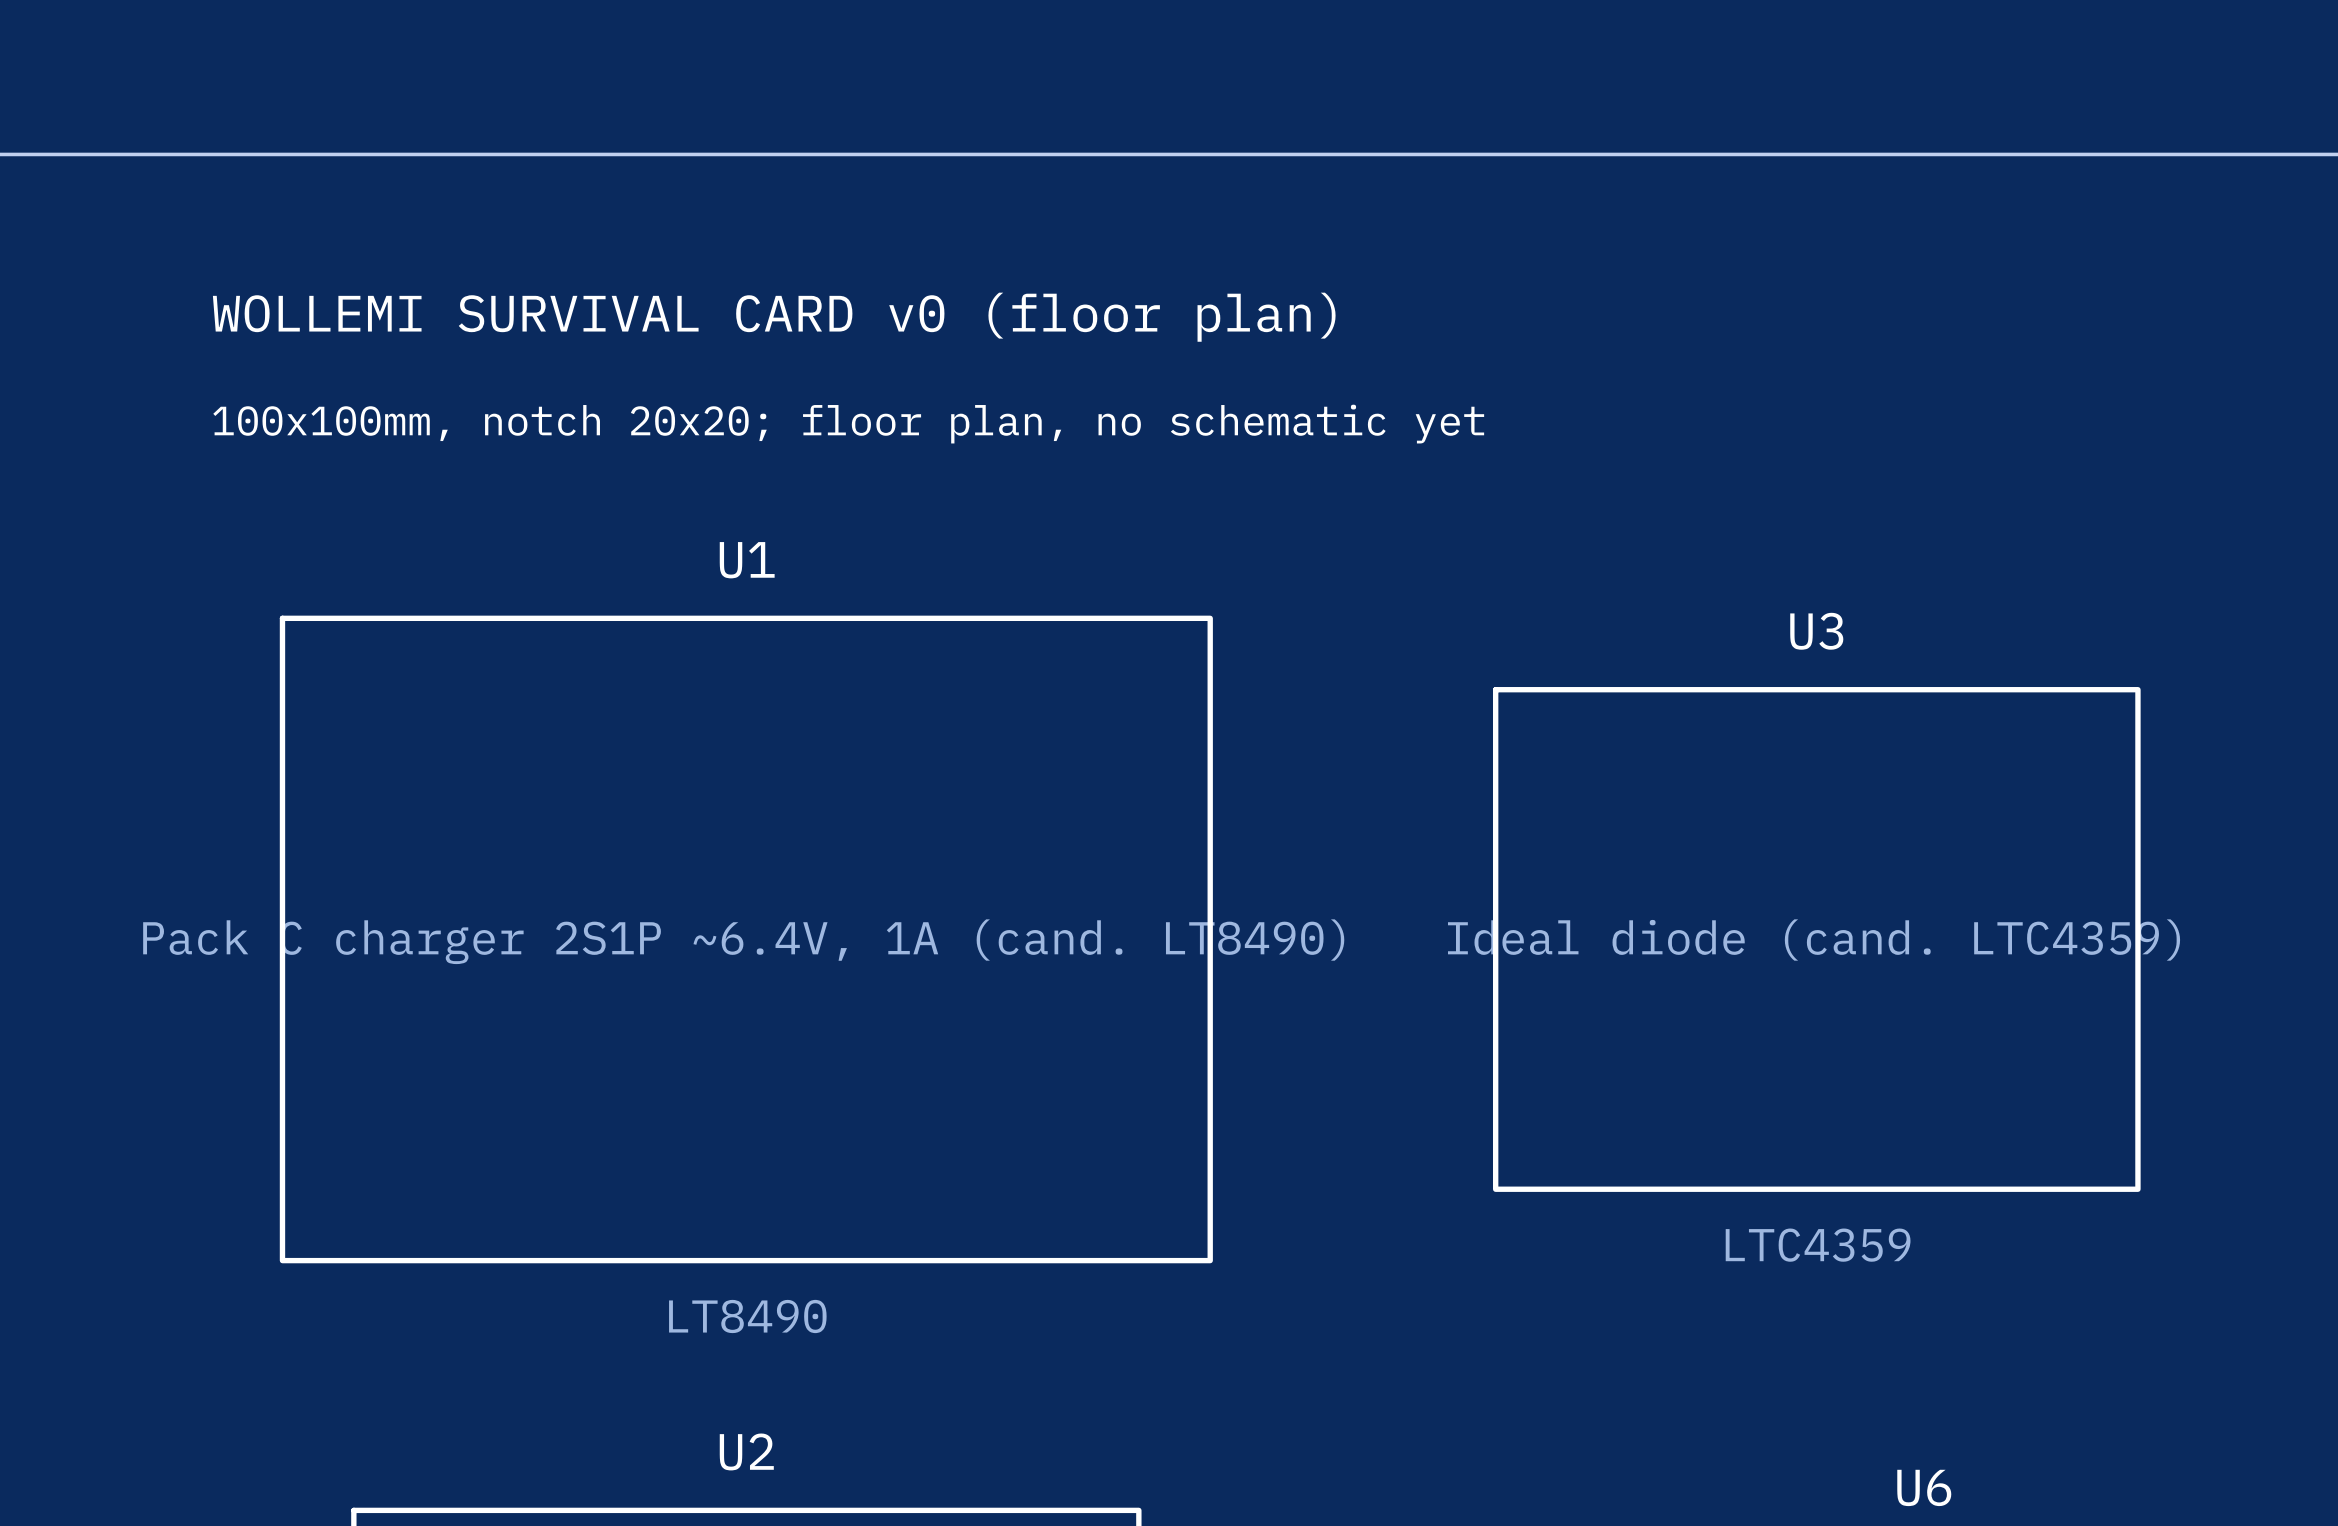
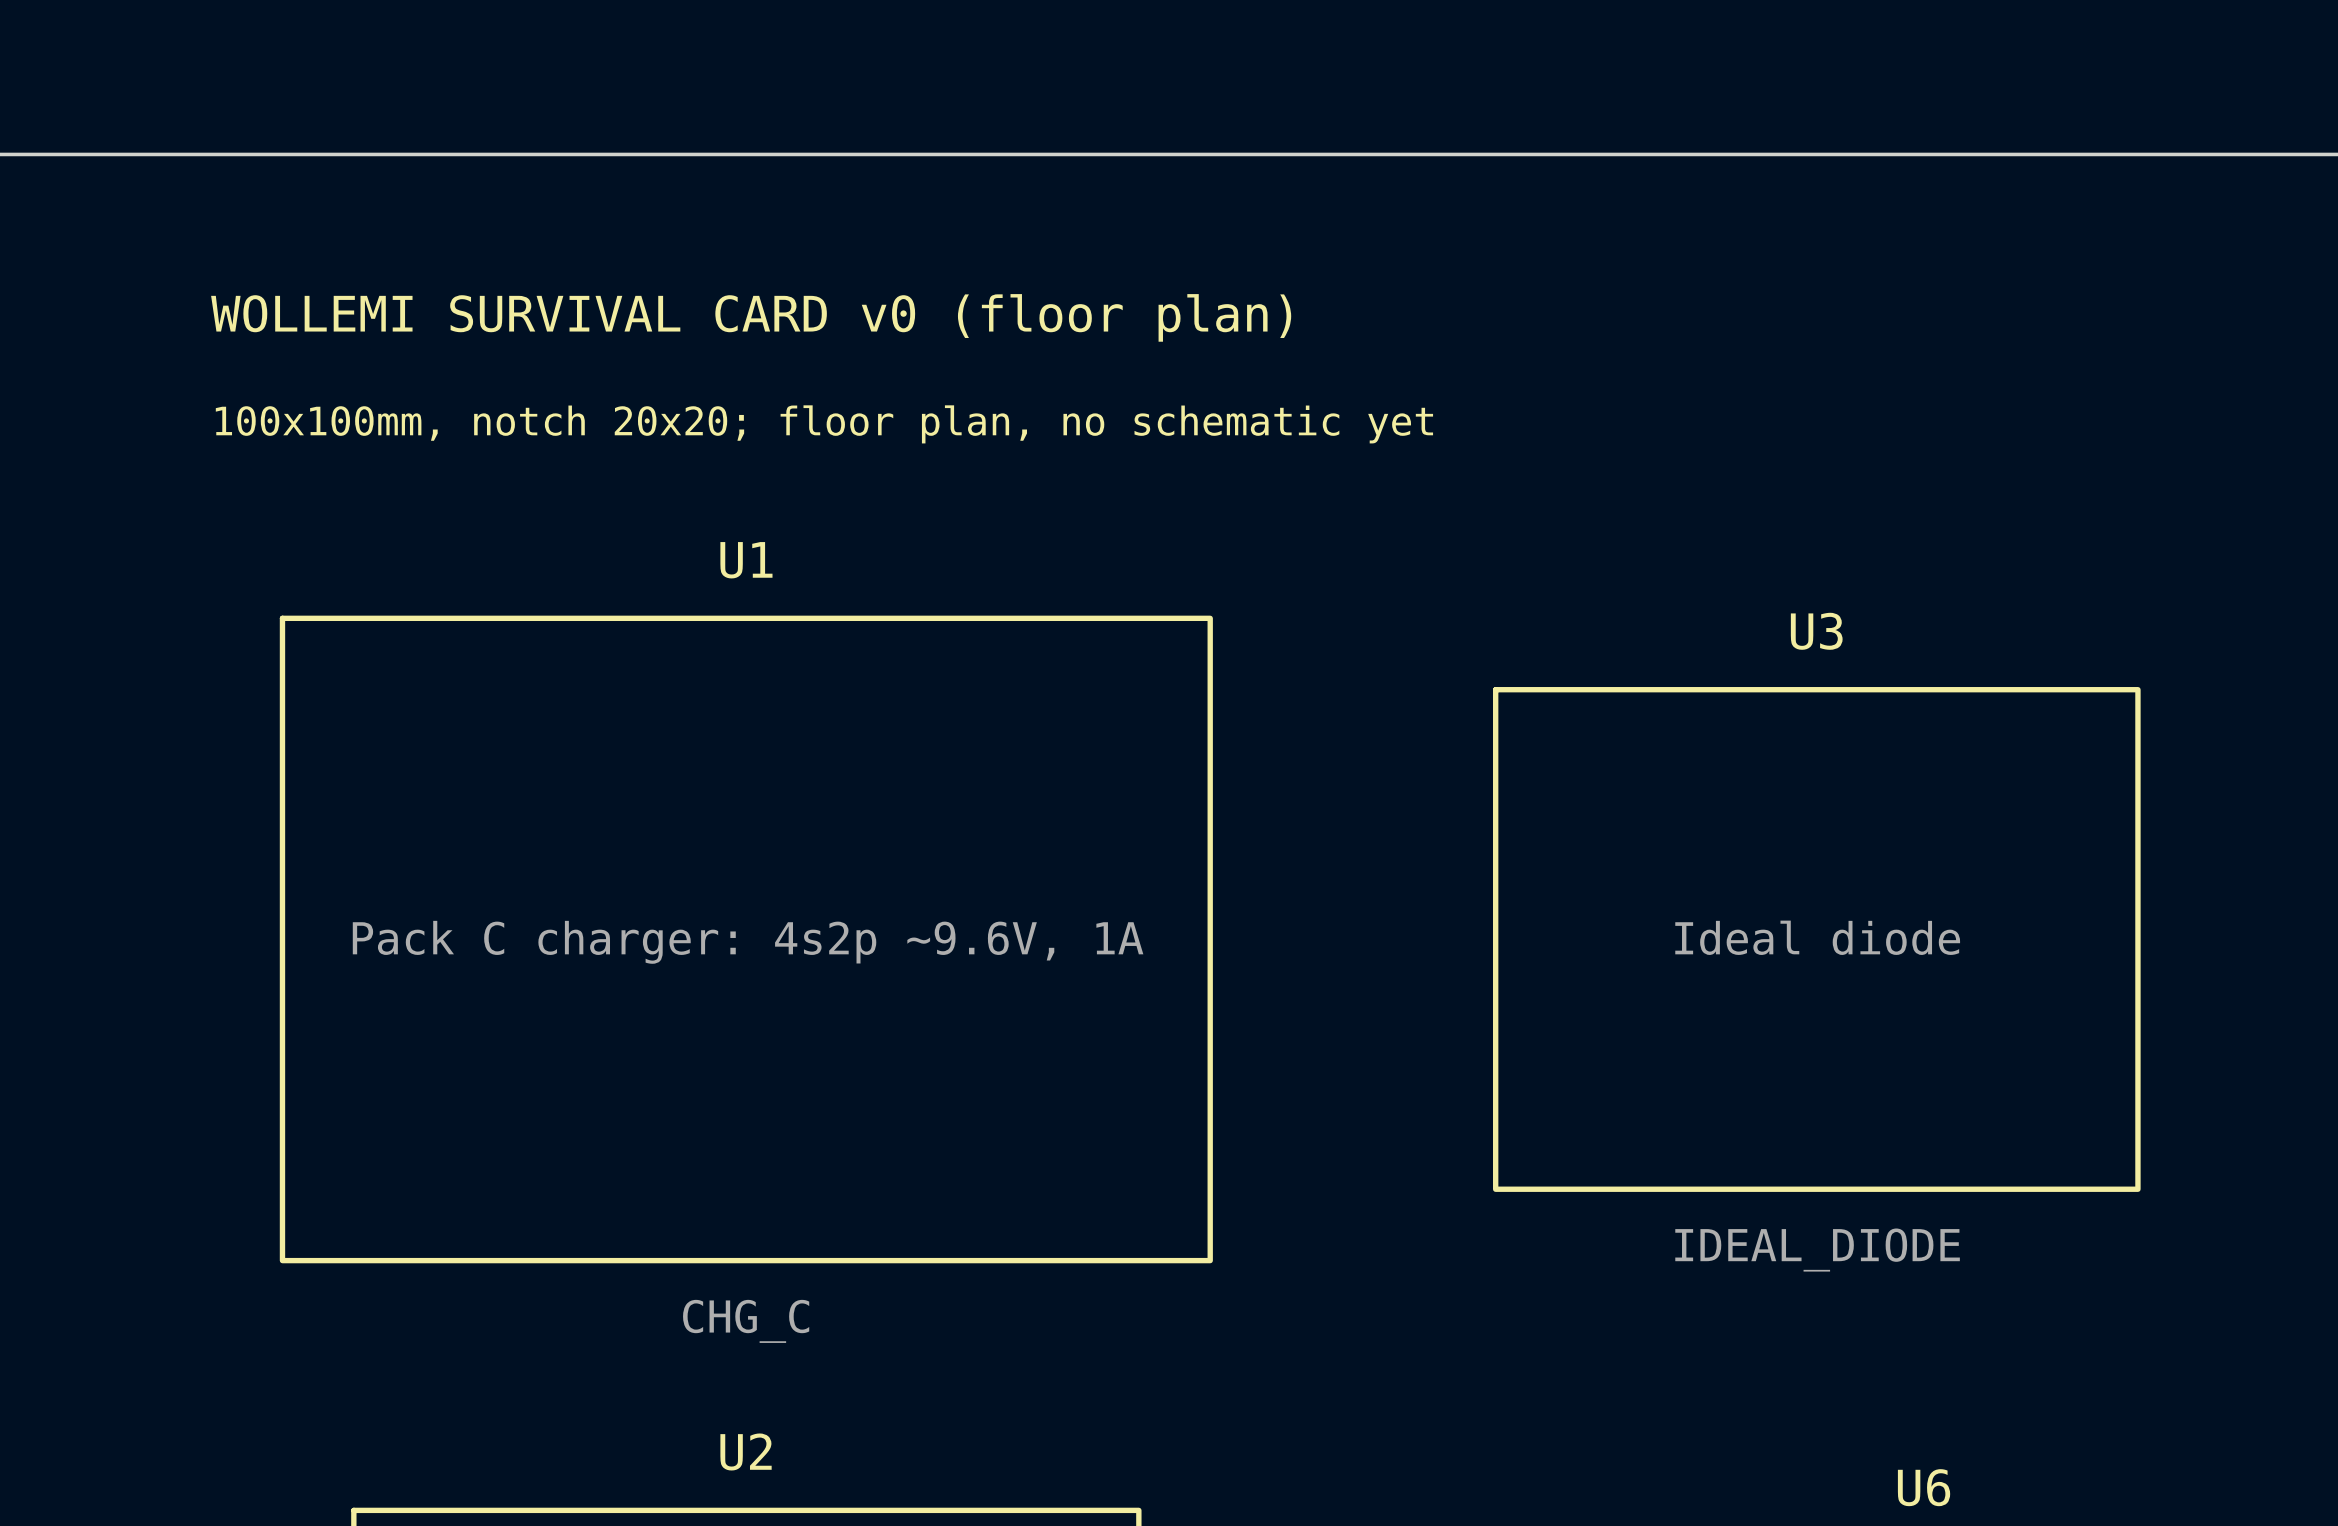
U3 text: Ideal diode (cand. LTC4359) (1814, 940) -> Ideal diode (1817, 937)
U1 text: Pack C charger 2S1P ~6.4V, 1A (cand. LT8490) (743, 941) -> Pack C charger: 4s2p ~9.6V, 1A (748, 942)
U3 value: LTC4359 (1818, 1245) -> IDEAL_DIODE (1817, 1250)
U1 value: LT8490 (747, 1316) -> CHG_C (746, 1321)

